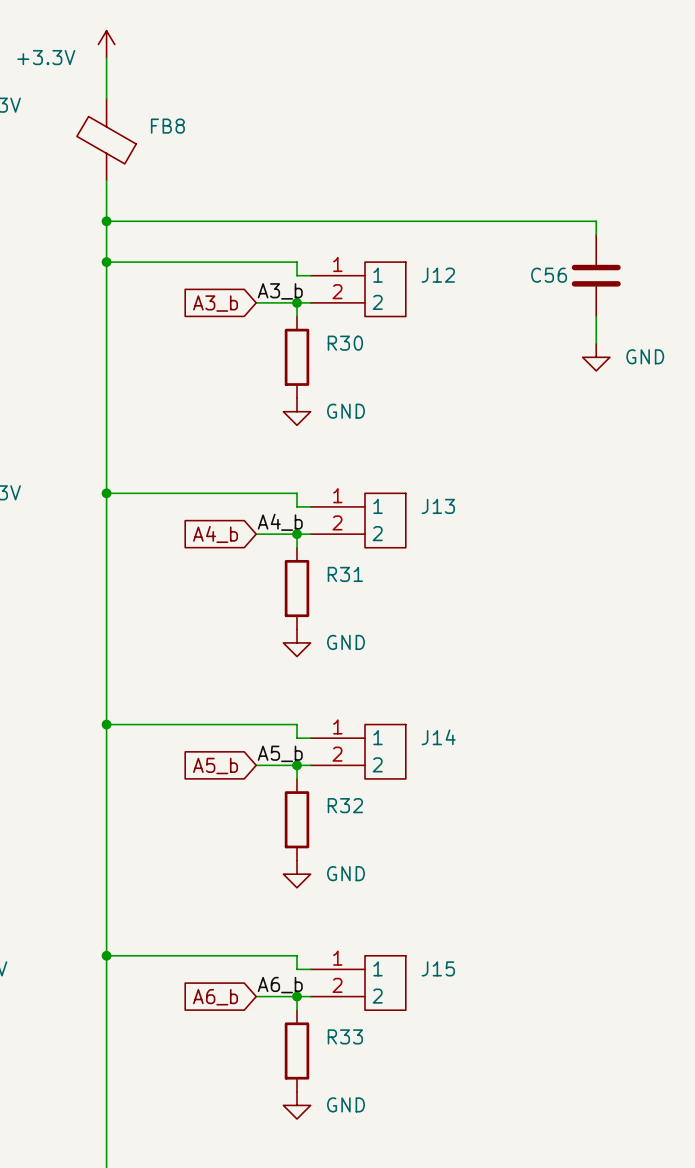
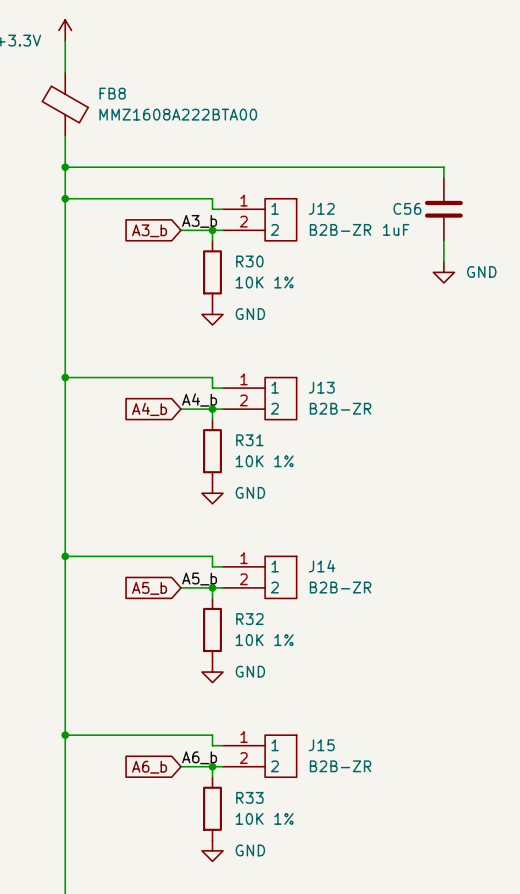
FB8 value: none -> MMZ1608A222BTA00 (178, 114)
J12 value: none -> B2B-ZR (340, 229)
C56 value: none -> 1uF (396, 229)
R30 value: none -> 10K 1% (264, 282)
J13 value: none -> B2B-ZR (340, 408)
R31 value: none -> 10K 1% (264, 461)
J14 value: none -> B2B-ZR (340, 587)
R32 value: none -> 10K 1% (264, 640)
J15 value: none -> B2B-ZR (340, 766)
R33 value: none -> 10K 1% (264, 818)

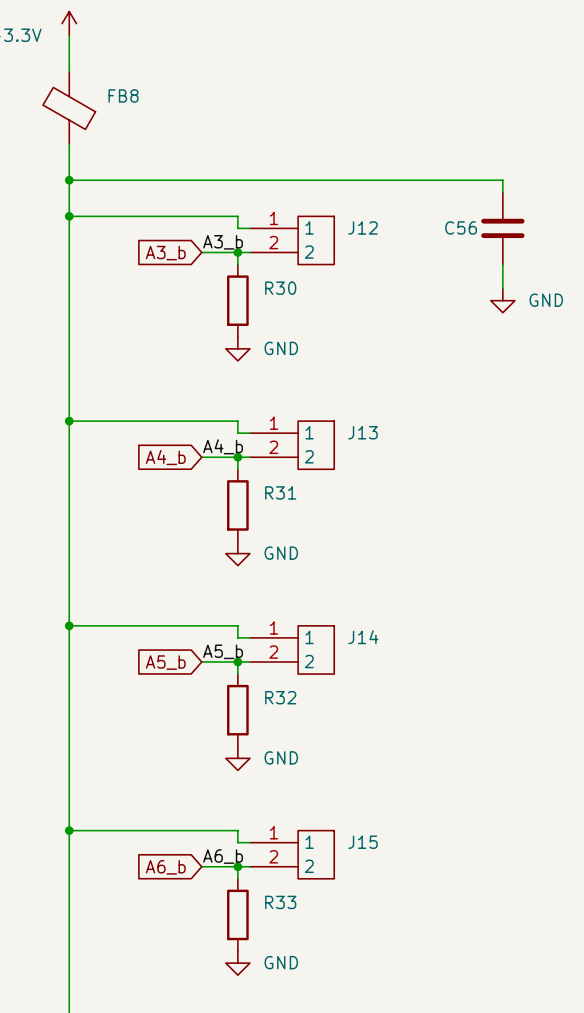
FB8 value: MMZ1608A222BTA00 (178, 114) -> none
J12 value: B2B-ZR (340, 229) -> none
C56 value: 1uF (396, 229) -> none
R30 value: 10K 1% (264, 282) -> none
J13 value: B2B-ZR (340, 408) -> none
R31 value: 10K 1% (264, 461) -> none
J14 value: B2B-ZR (340, 587) -> none
R32 value: 10K 1% (264, 640) -> none
J15 value: B2B-ZR (340, 766) -> none
R33 value: 10K 1% (264, 818) -> none

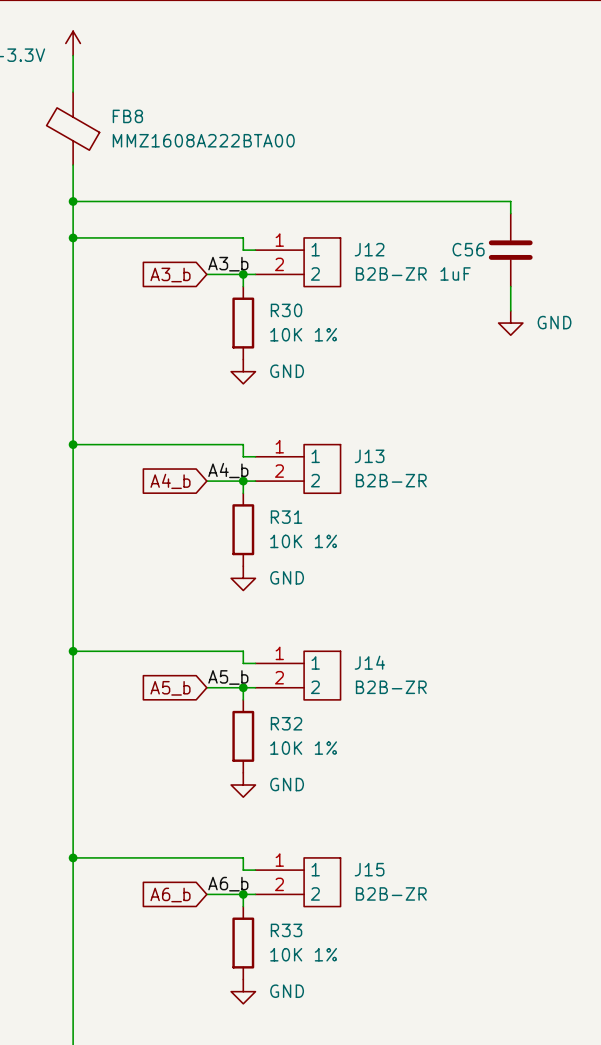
FB8 value: none -> MMZ1608A222BTA00 (203, 140)
J12 value: none -> B2B-ZR (391, 273)
C56 value: none -> 1uF (455, 273)
R30 value: none -> 10K 1% (303, 334)
J13 value: none -> B2B-ZR (391, 480)
R31 value: none -> 10K 1% (303, 541)
J14 value: none -> B2B-ZR (391, 687)
R32 value: none -> 10K 1% (303, 748)
J15 value: none -> B2B-ZR (391, 893)
R33 value: none -> 10K 1% (303, 954)

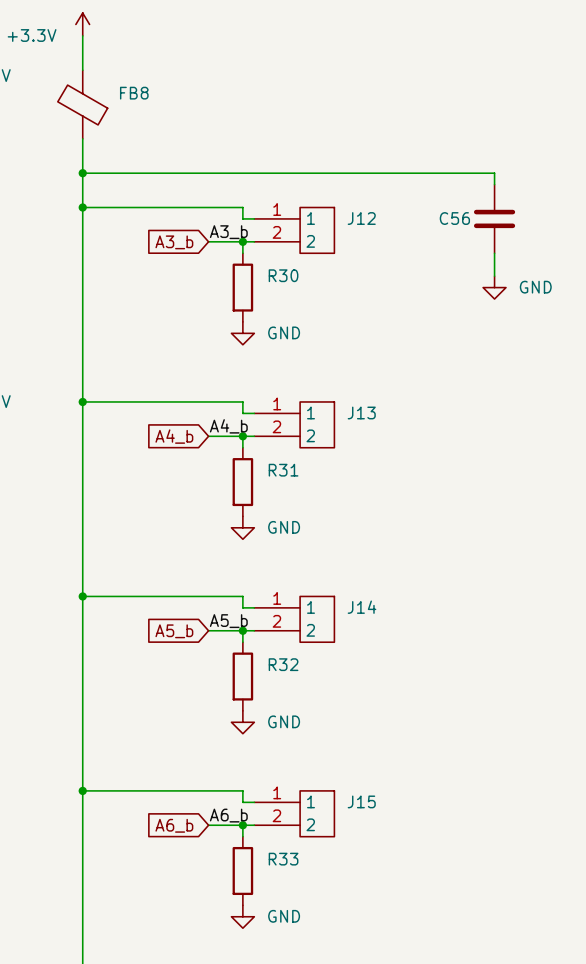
FB8 value: MMZ1608A222BTA00 (203, 140) -> none
J12 value: B2B-ZR (391, 273) -> none
C56 value: 1uF (455, 273) -> none
R30 value: 10K 1% (303, 334) -> none
J13 value: B2B-ZR (391, 480) -> none
R31 value: 10K 1% (303, 541) -> none
J14 value: B2B-ZR (391, 687) -> none
R32 value: 10K 1% (303, 748) -> none
J15 value: B2B-ZR (391, 893) -> none
R33 value: 10K 1% (303, 954) -> none

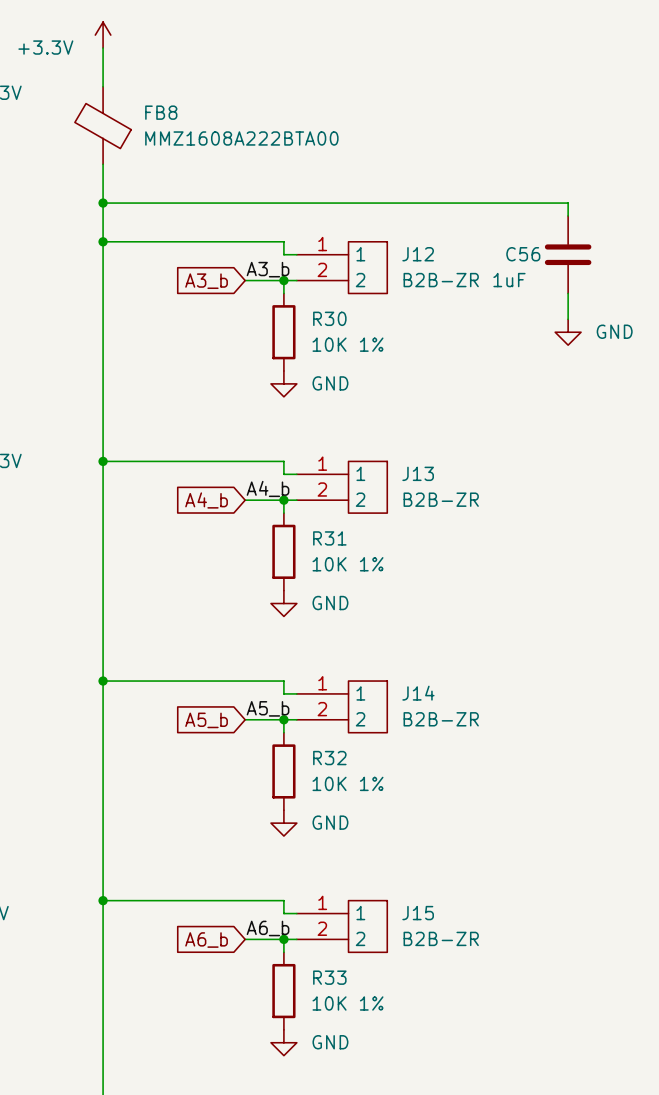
FB8 value: none -> MMZ1608A222BTA00 (241, 138)
J12 value: none -> B2B-ZR (441, 280)
C56 value: none -> 1uF (509, 280)
R30 value: none -> 10K 1% (347, 344)
J13 value: none -> B2B-ZR (441, 499)
R31 value: none -> 10K 1% (347, 564)
J14 value: none -> B2B-ZR (441, 719)
R32 value: none -> 10K 1% (347, 783)
J15 value: none -> B2B-ZR (441, 938)
R33 value: none -> 10K 1% (347, 1003)

